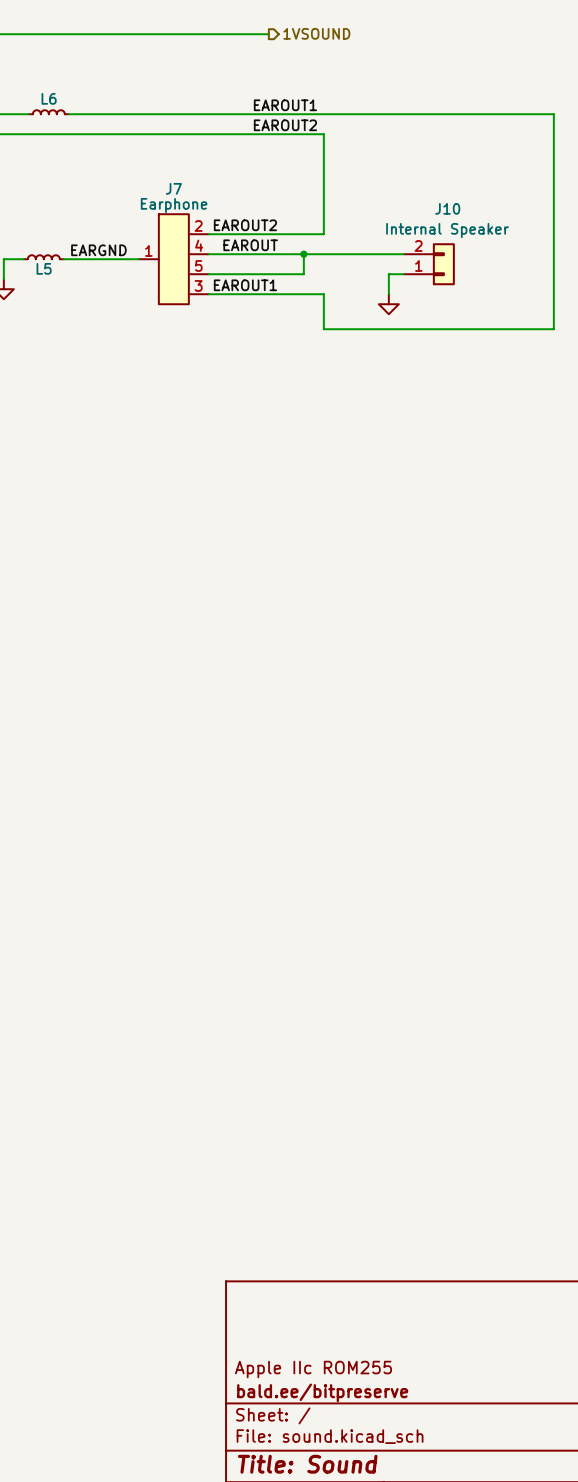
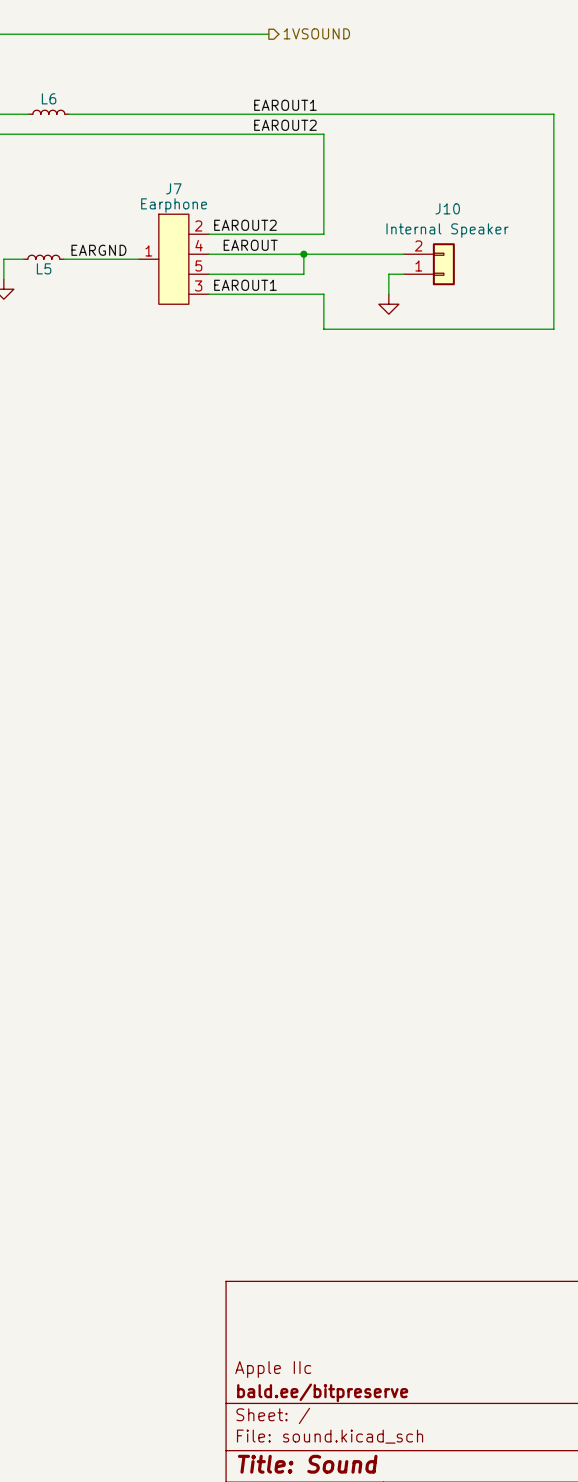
title block: Apple IIc ROM255 (313, 1369) -> Apple IIc (273, 1369)

